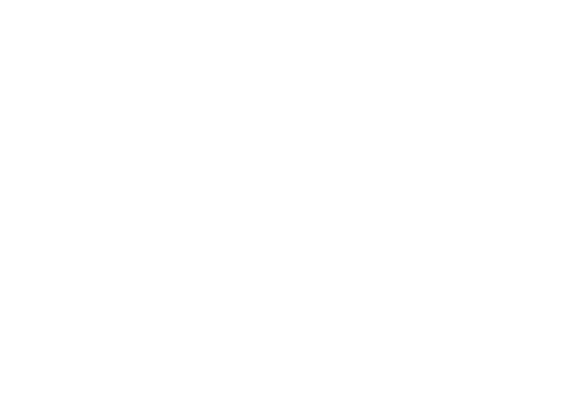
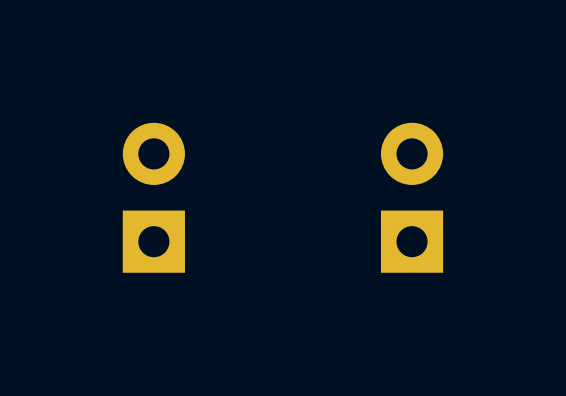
part: none -> (153, 197)
part: none -> (412, 197)

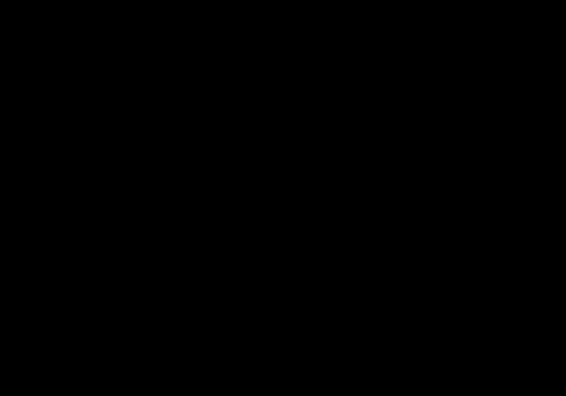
part: (153, 197) -> none
part: (412, 197) -> none

